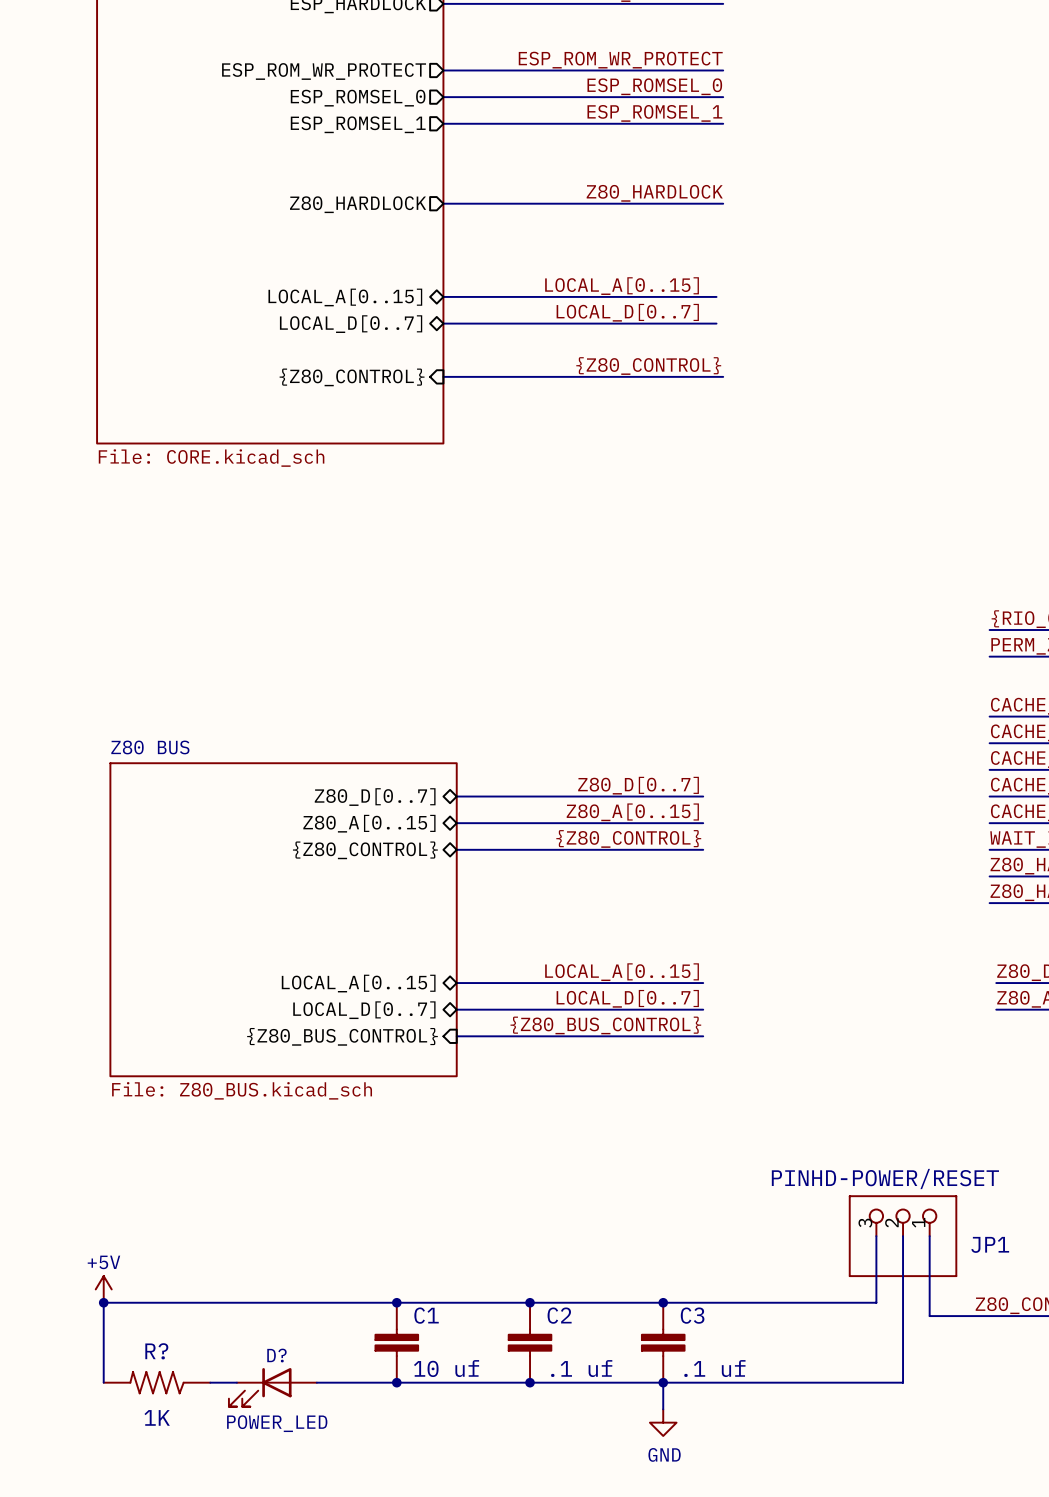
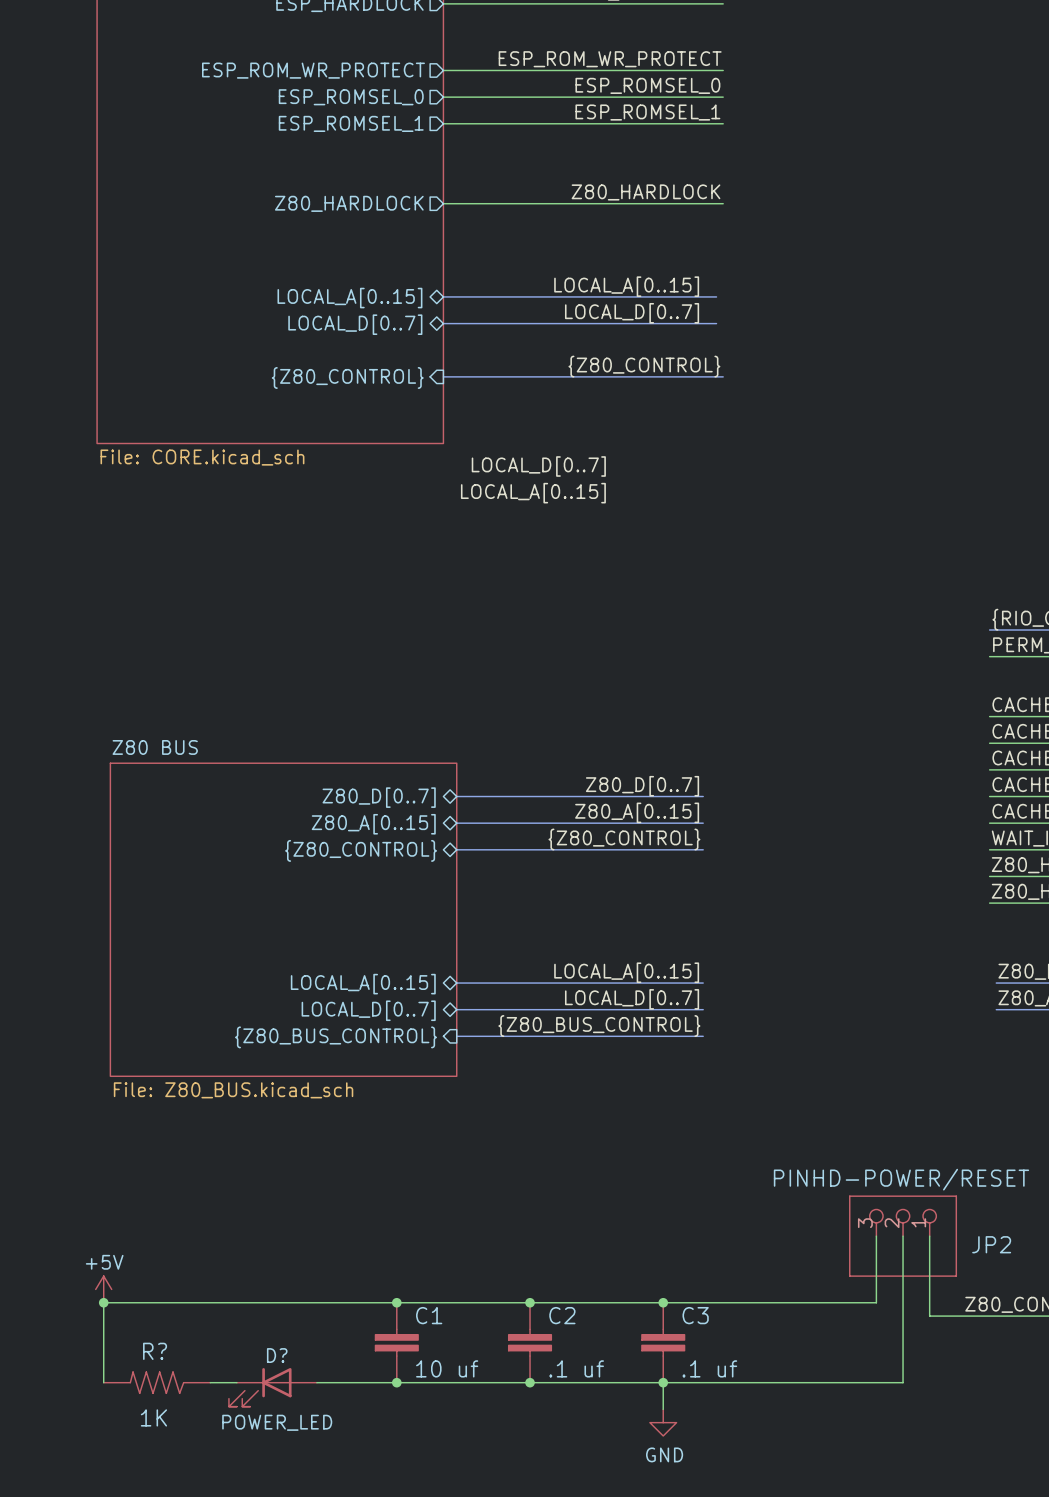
label: none -> LOCAL_D[0..7] (538, 466)
label: none -> LOCAL_A[0..15] (533, 493)
JP1 name: JP1 (990, 1244) -> JP2 (991, 1244)

